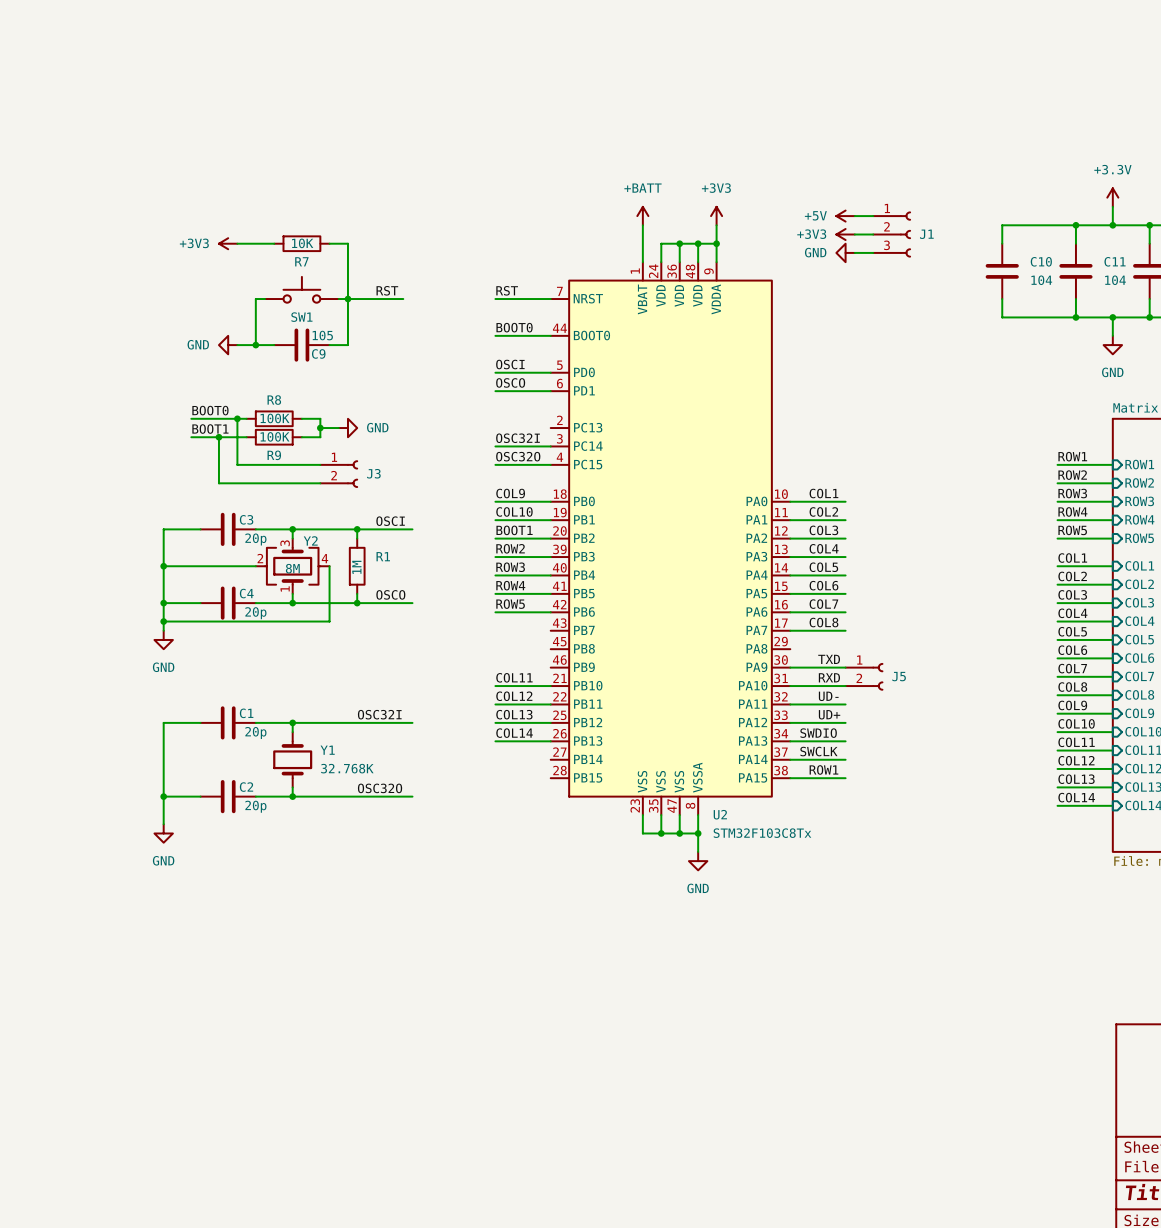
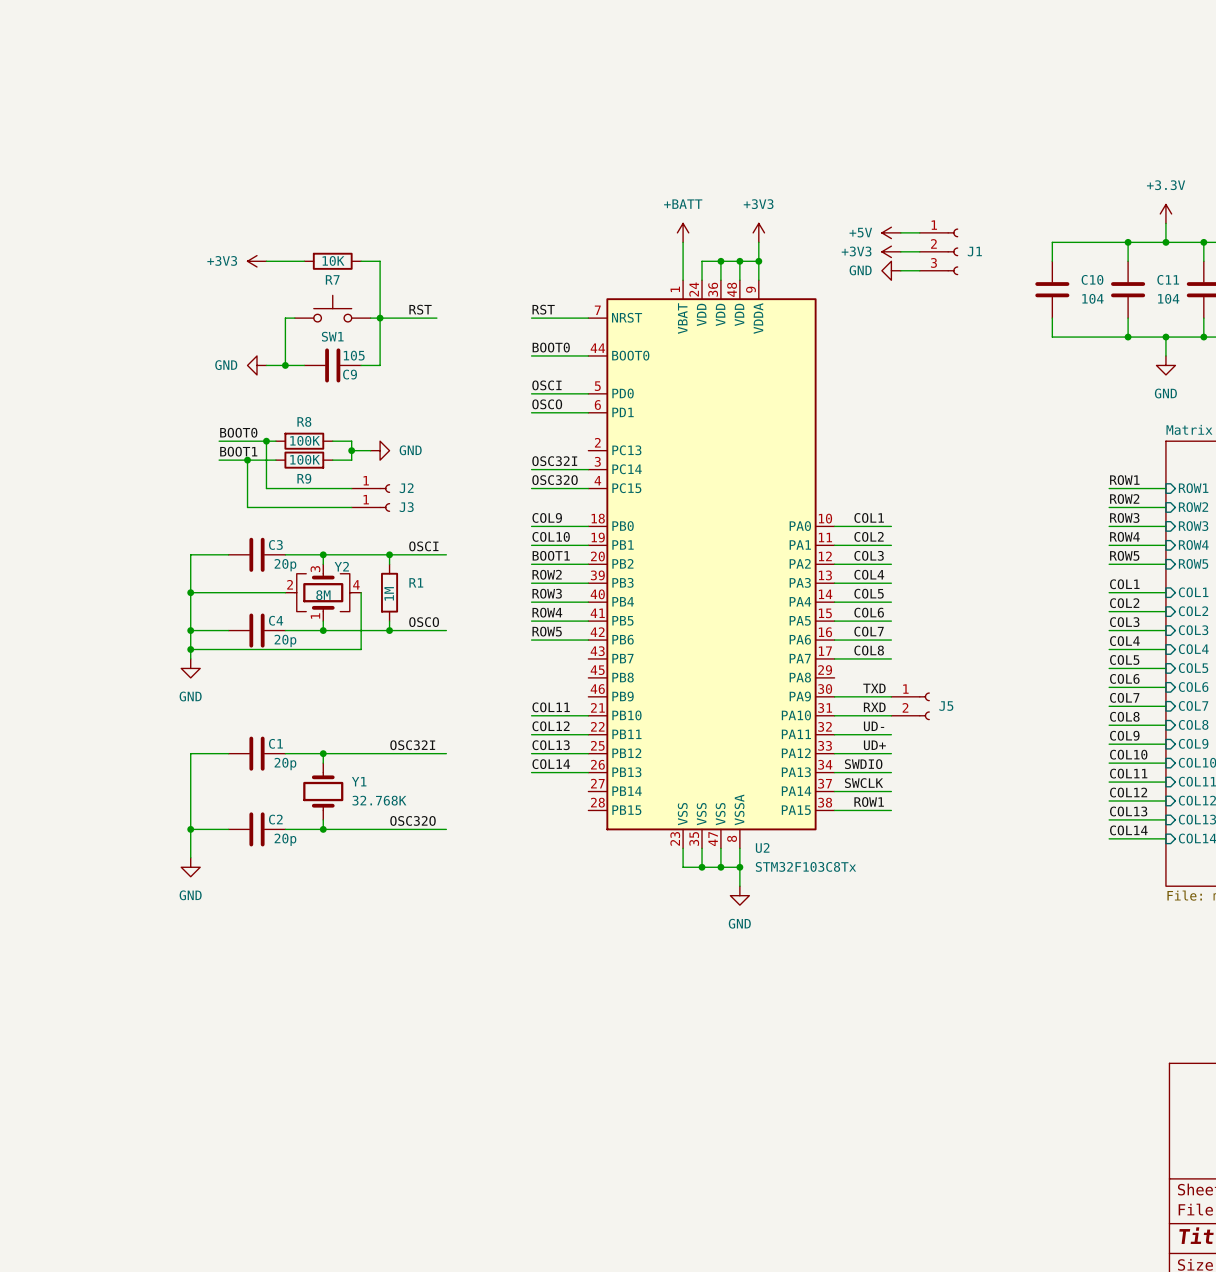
J3 symbol: [320, 460, 358, 488] -> [351, 503, 391, 512]
J2: none -> (370, 488)

